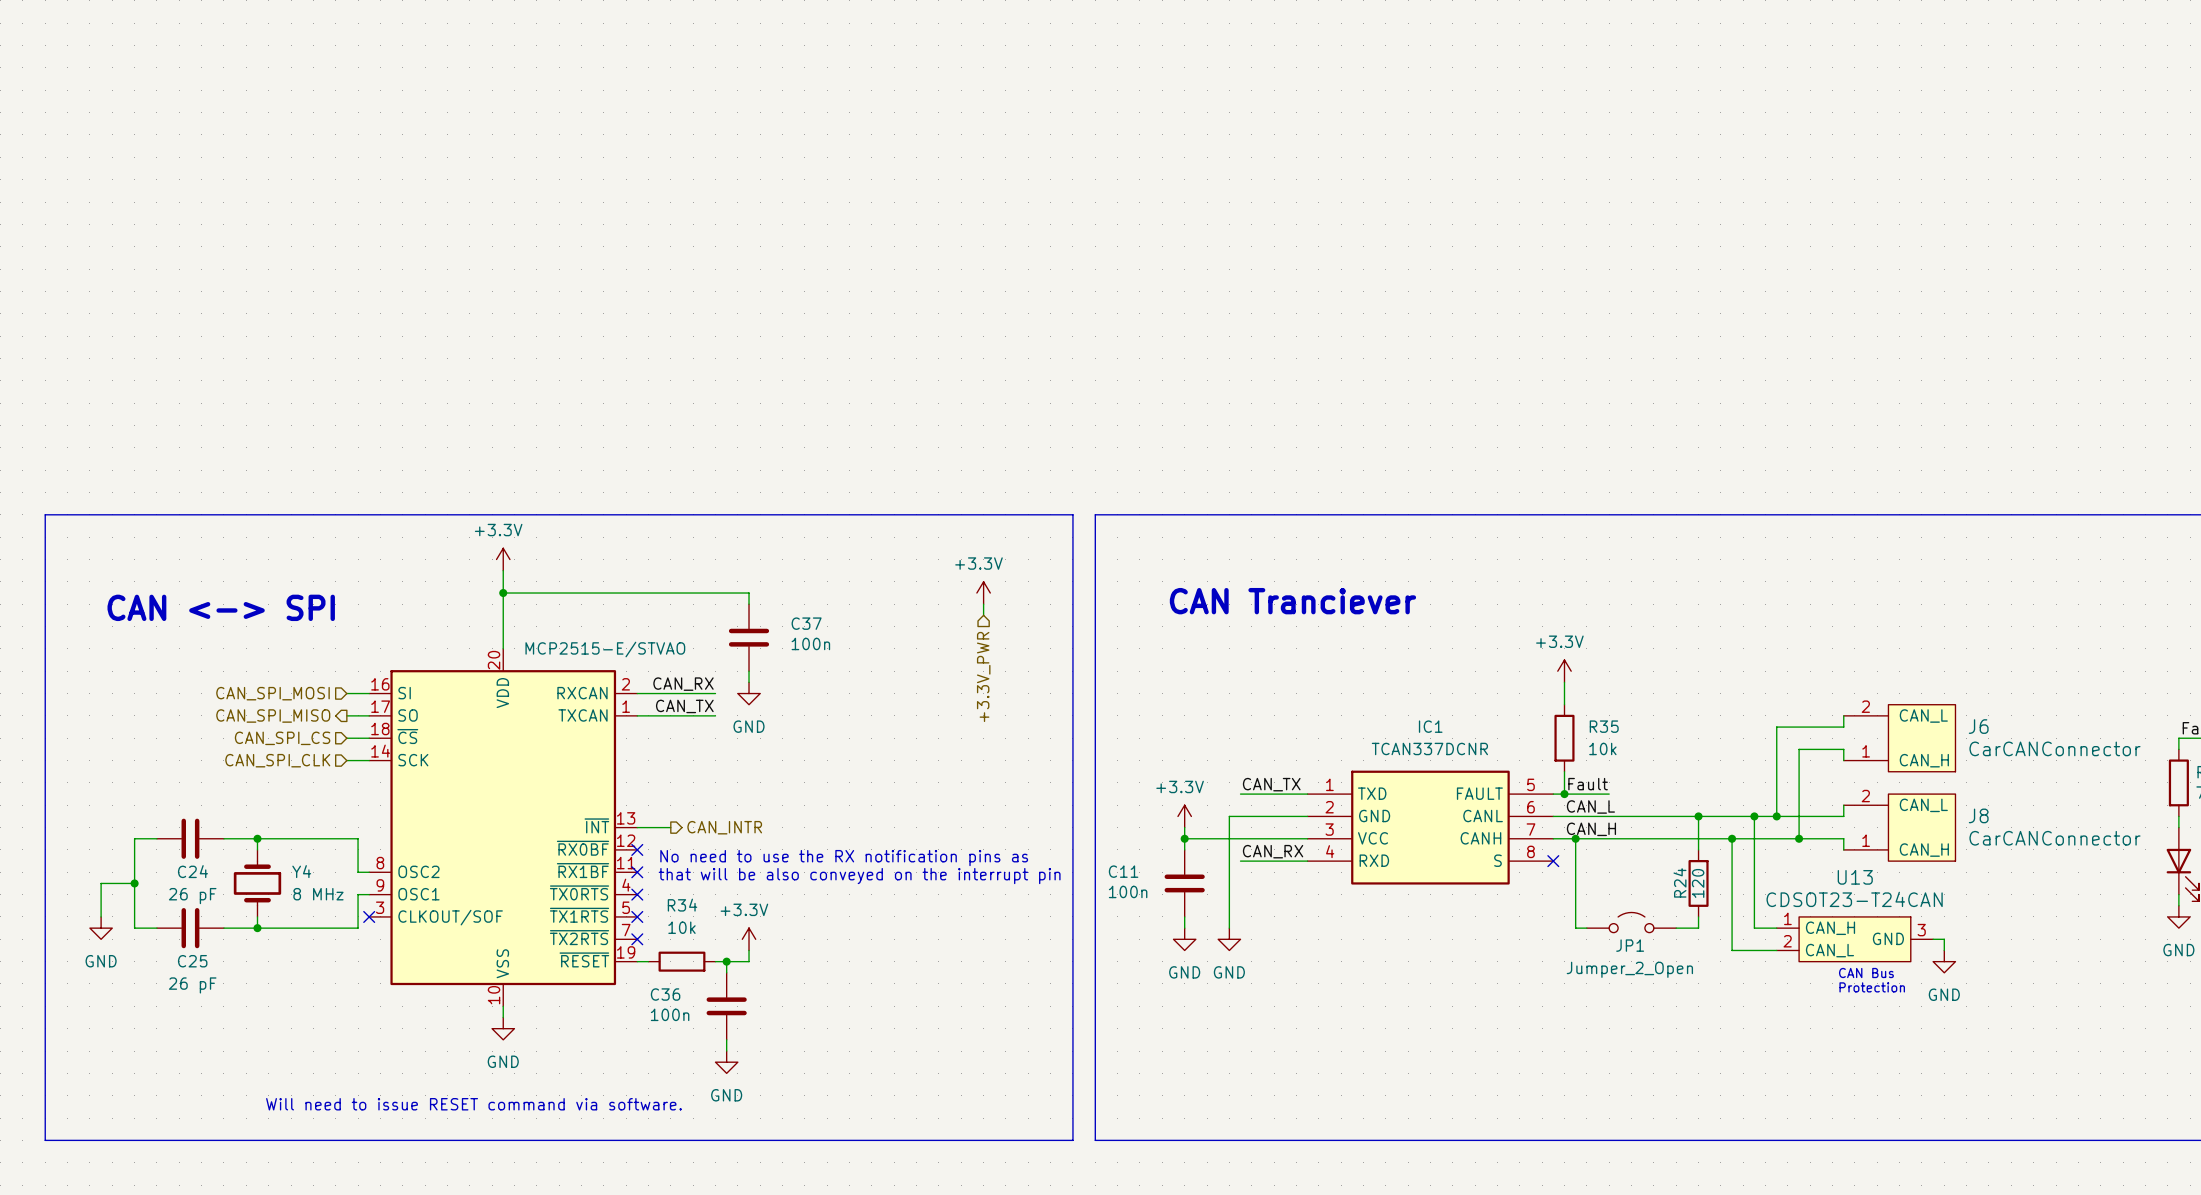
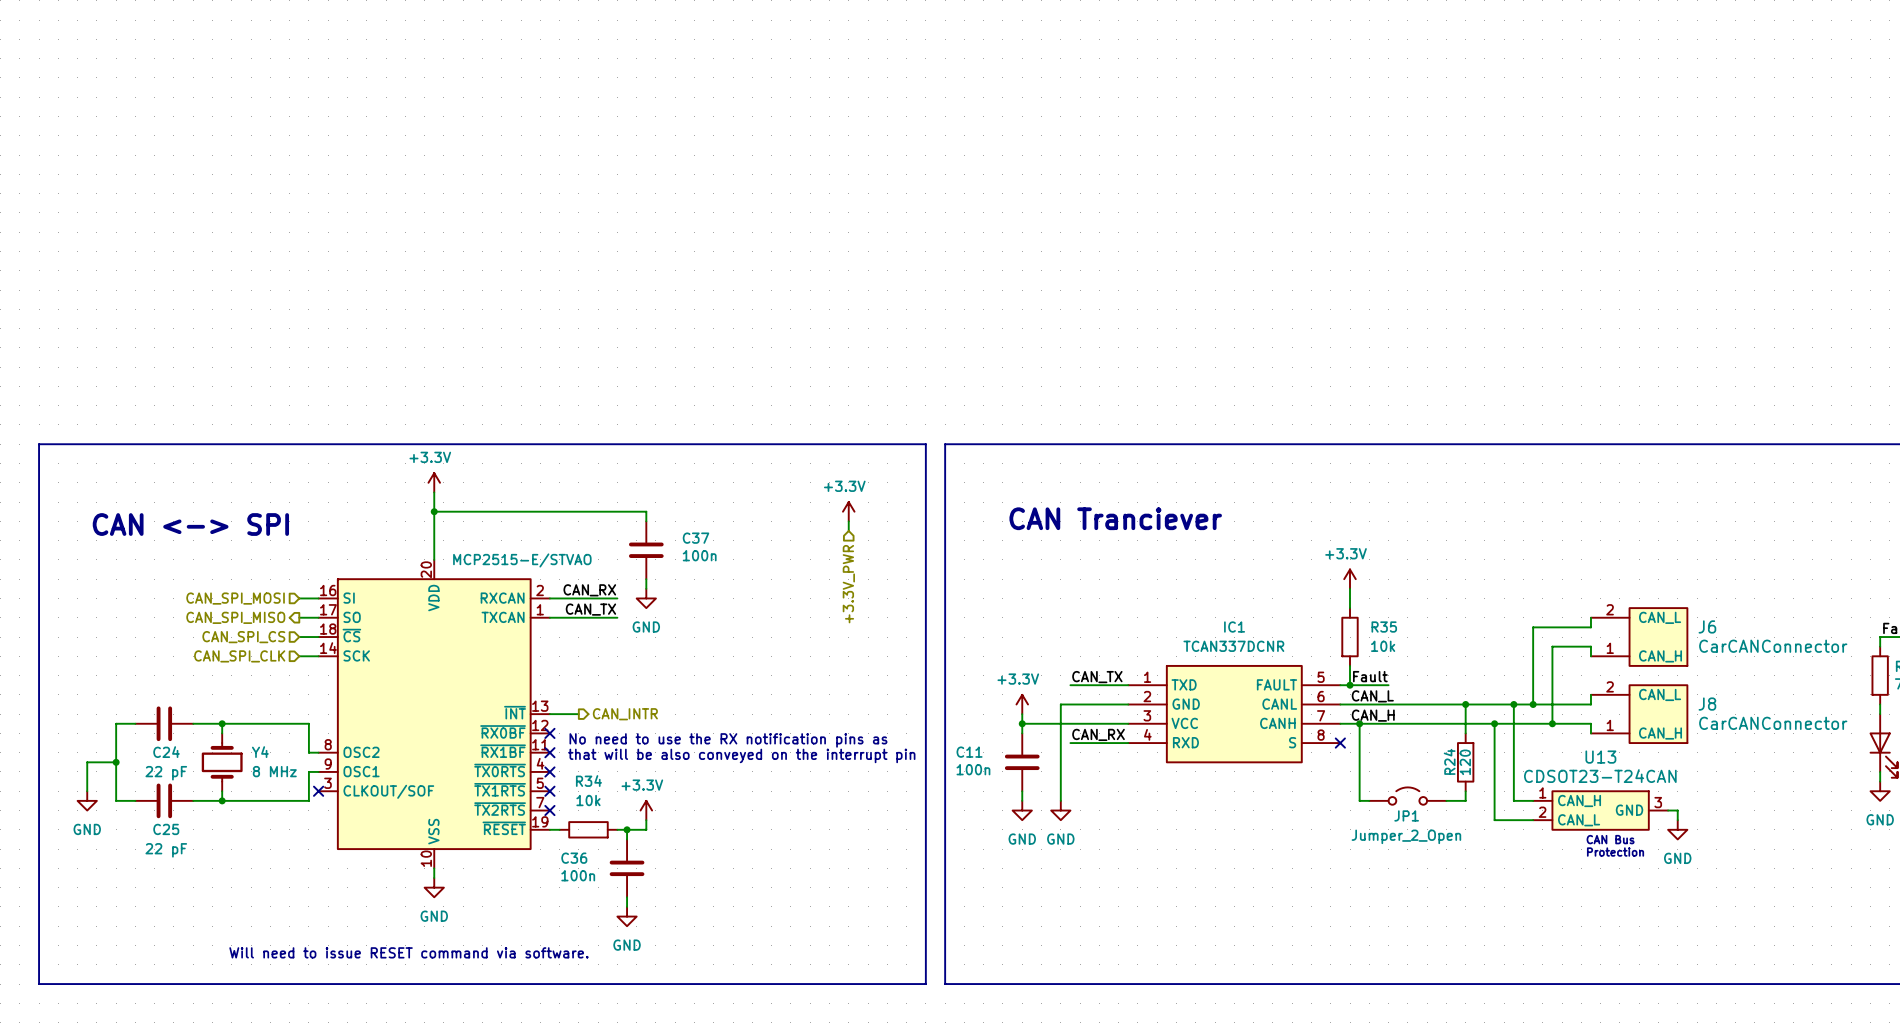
C24 value: 26 pF (192, 896) -> 22 pF (166, 773)
C25 value: 26 pF (192, 985) -> 22 pF (166, 850)

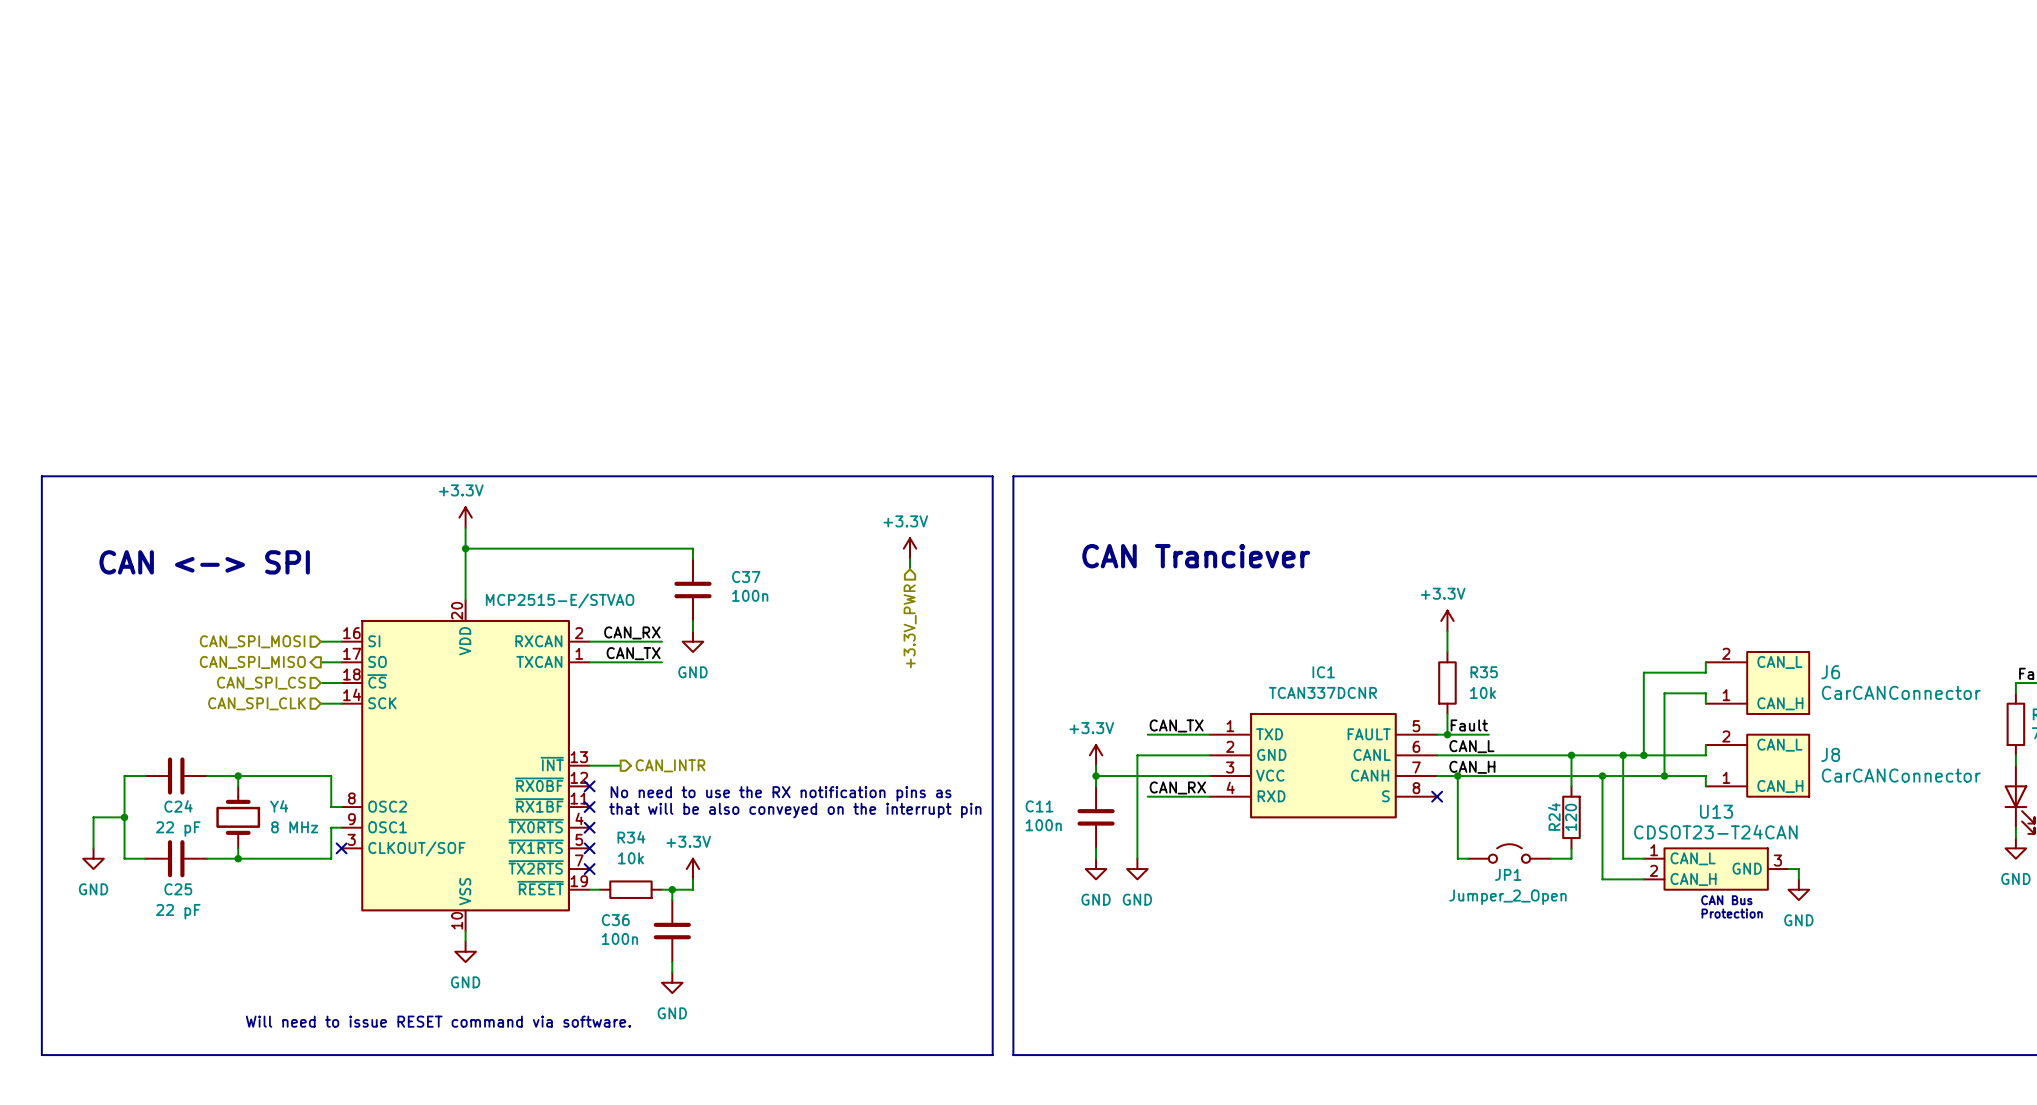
U13 pin name: CAN_H (1579, 800) -> CAN_L (1693, 858)
U13 pin name: CAN_L (1579, 820) -> CAN_H (1693, 879)

